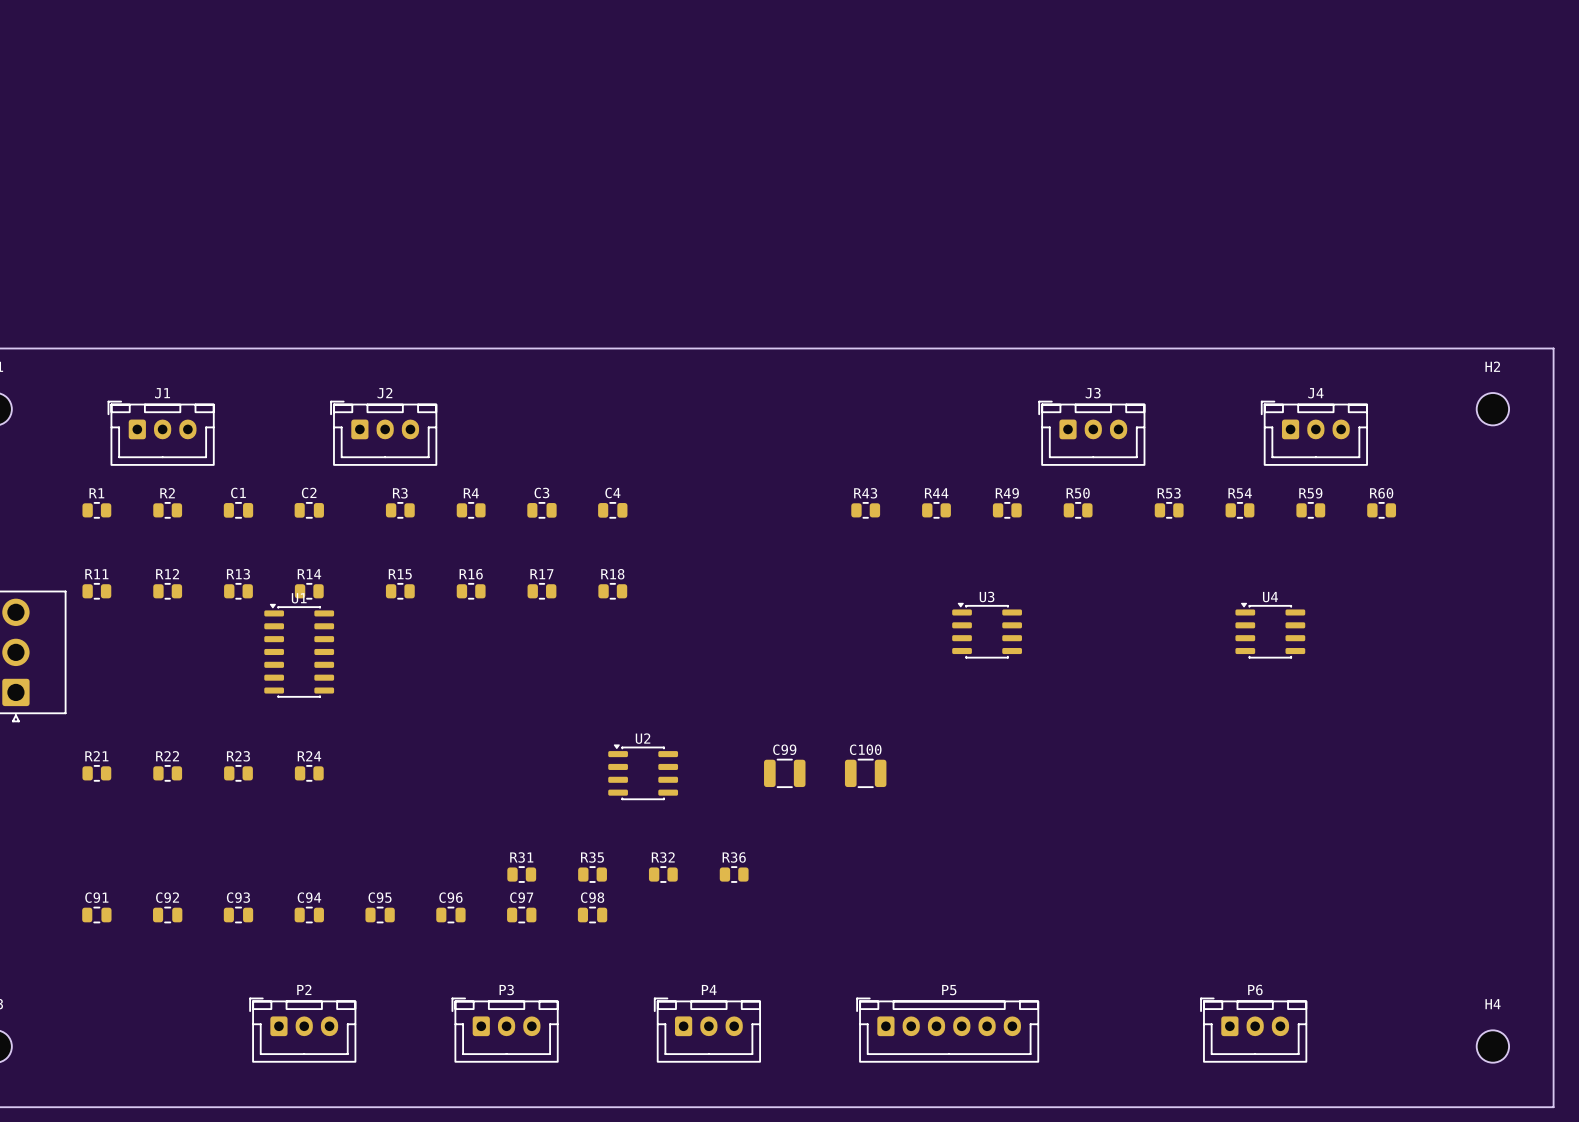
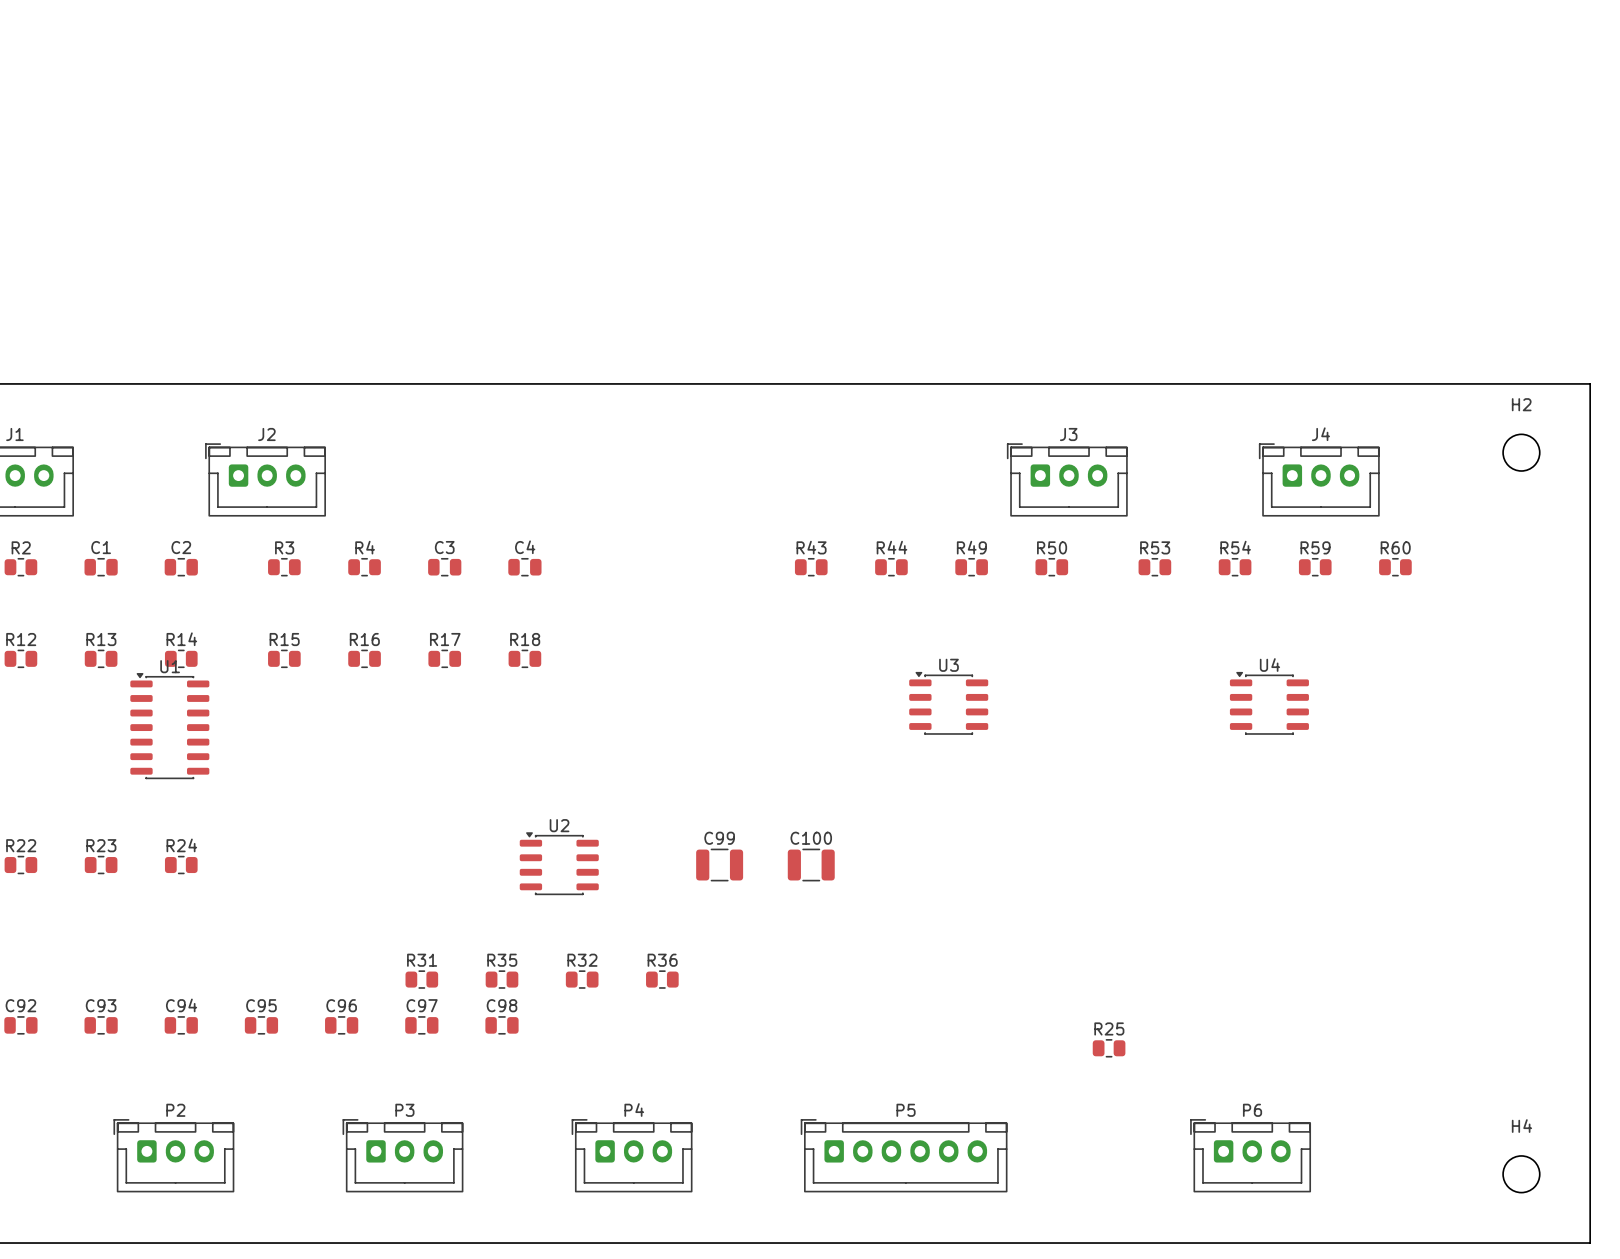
R25: none -> (1109, 1048)

